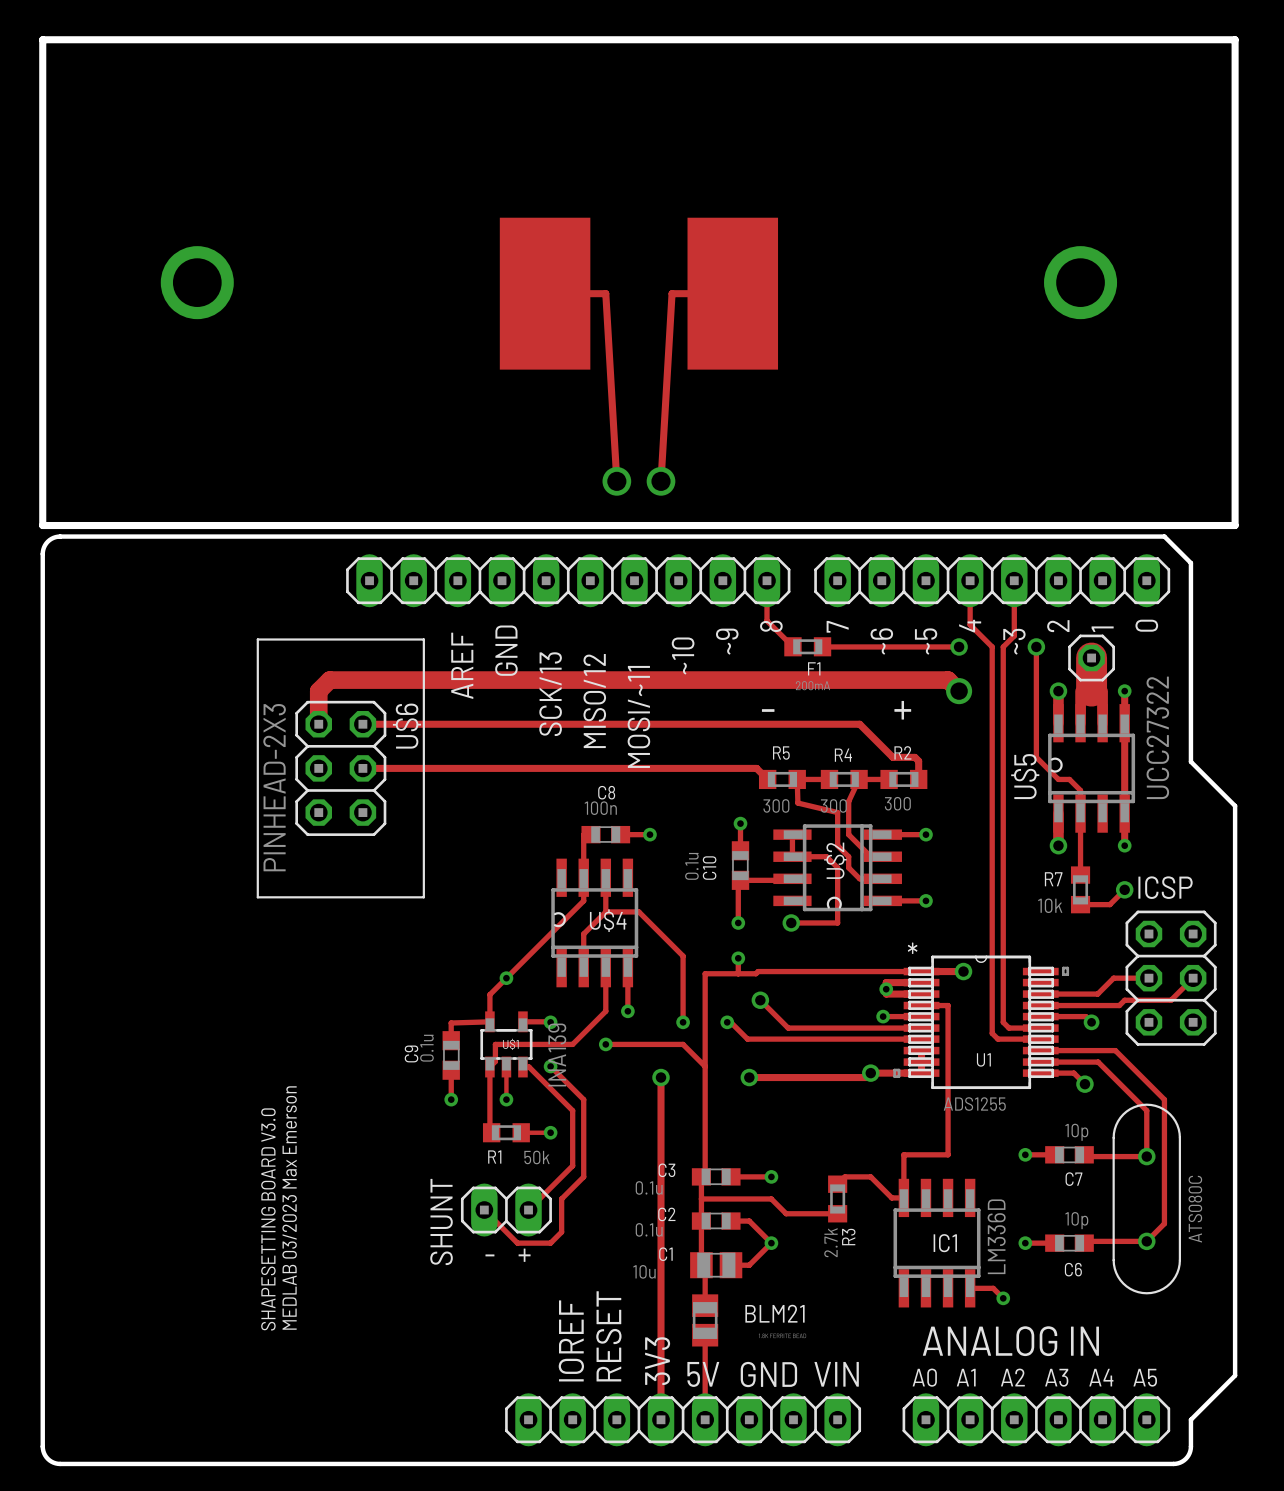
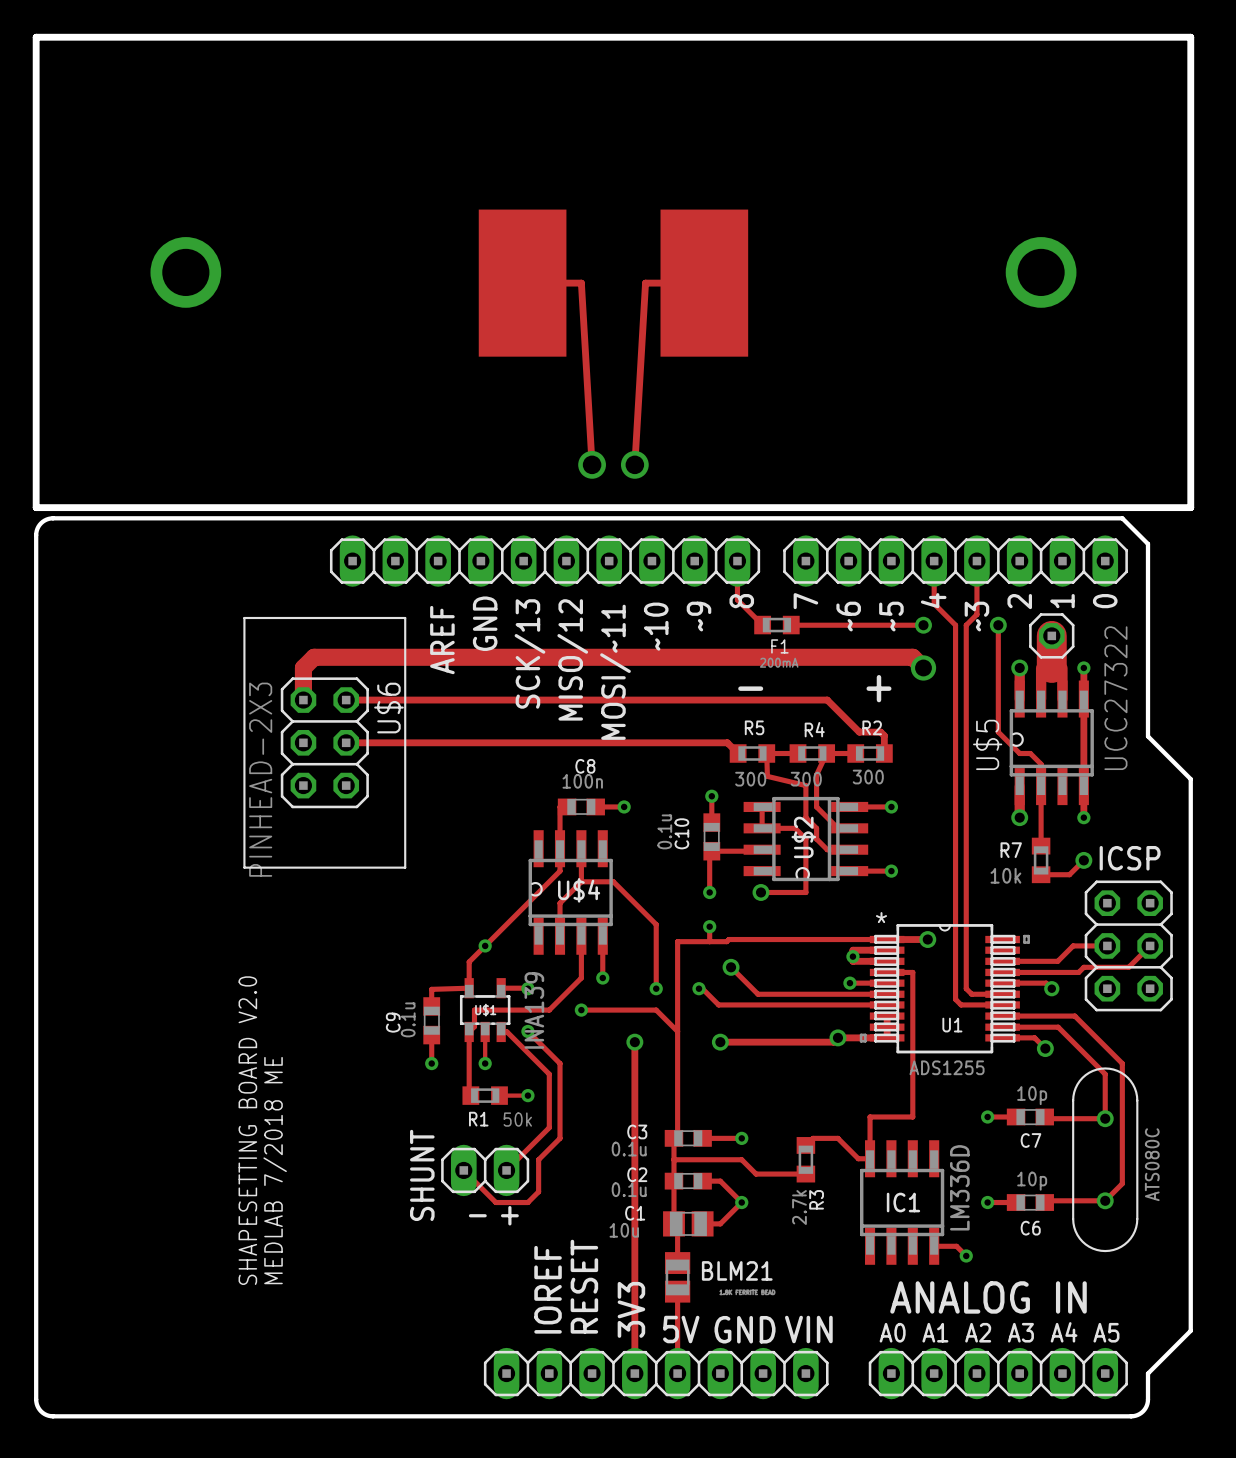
text: MEDLAB 03/2023 Max Emerson (289, 1208) -> MEDLAB 7/2018 ME (275, 1170)
text: SHAPESETTING BOARD V3.0 (268, 1219) -> SHAPESETTING BOARD V2.0 (247, 1130)

